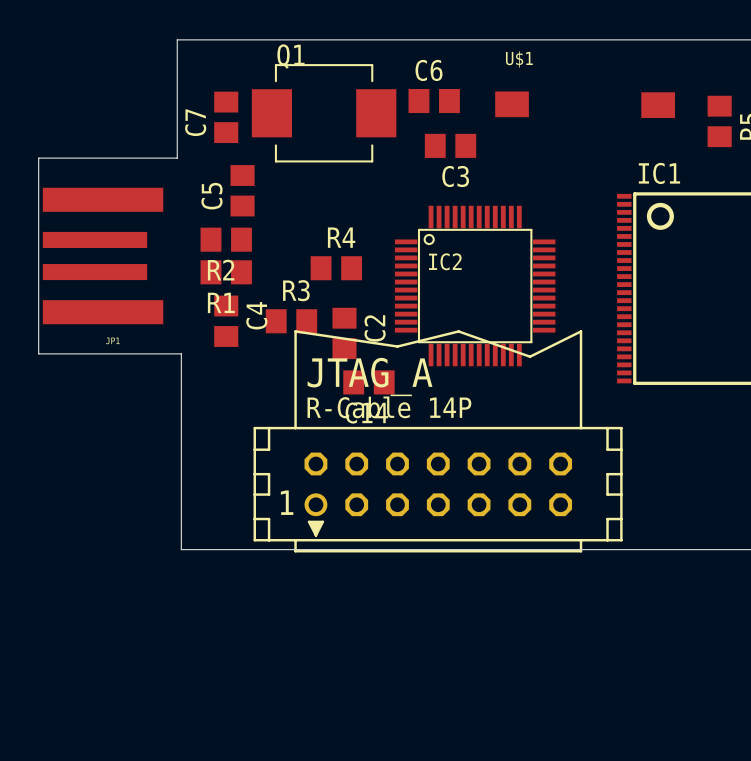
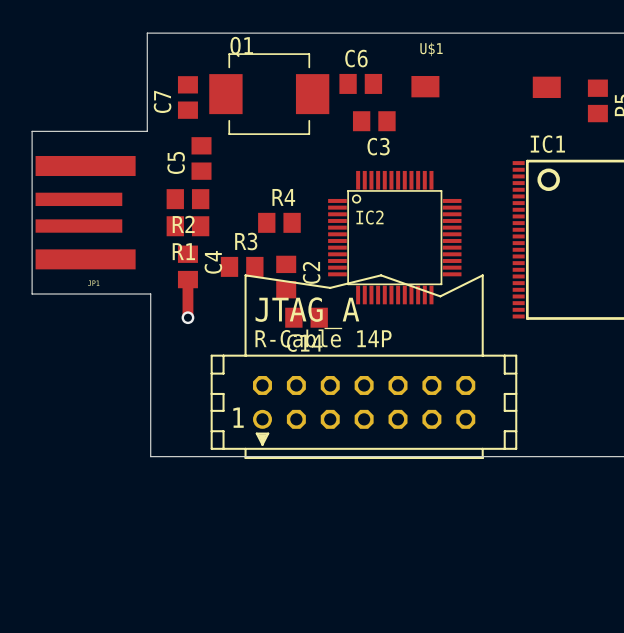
track: none -> (187, 279) (187, 317)
via: none -> (187, 317)

